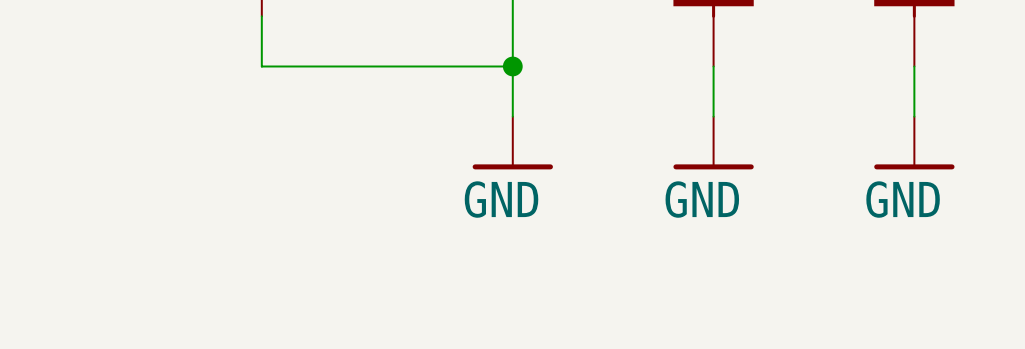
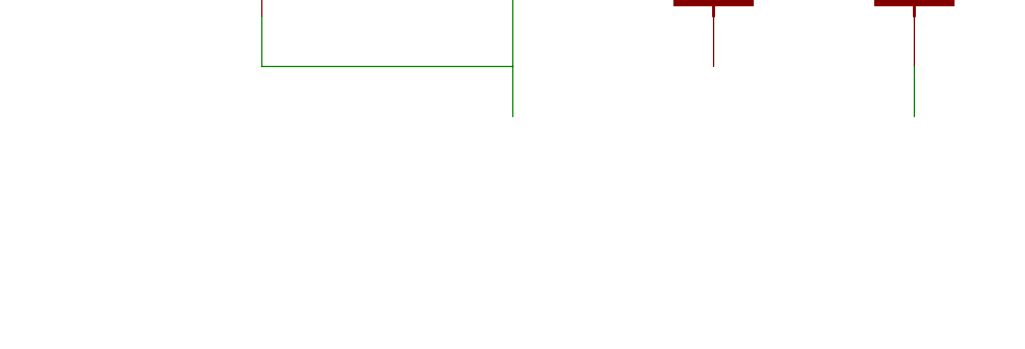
junction: (512, 66) -> none
wire: (713, 66) (713, 116) -> none
power symbol: GND (512, 143) -> none
power symbol: GND (713, 143) -> none
power symbol: GND (914, 143) -> none

